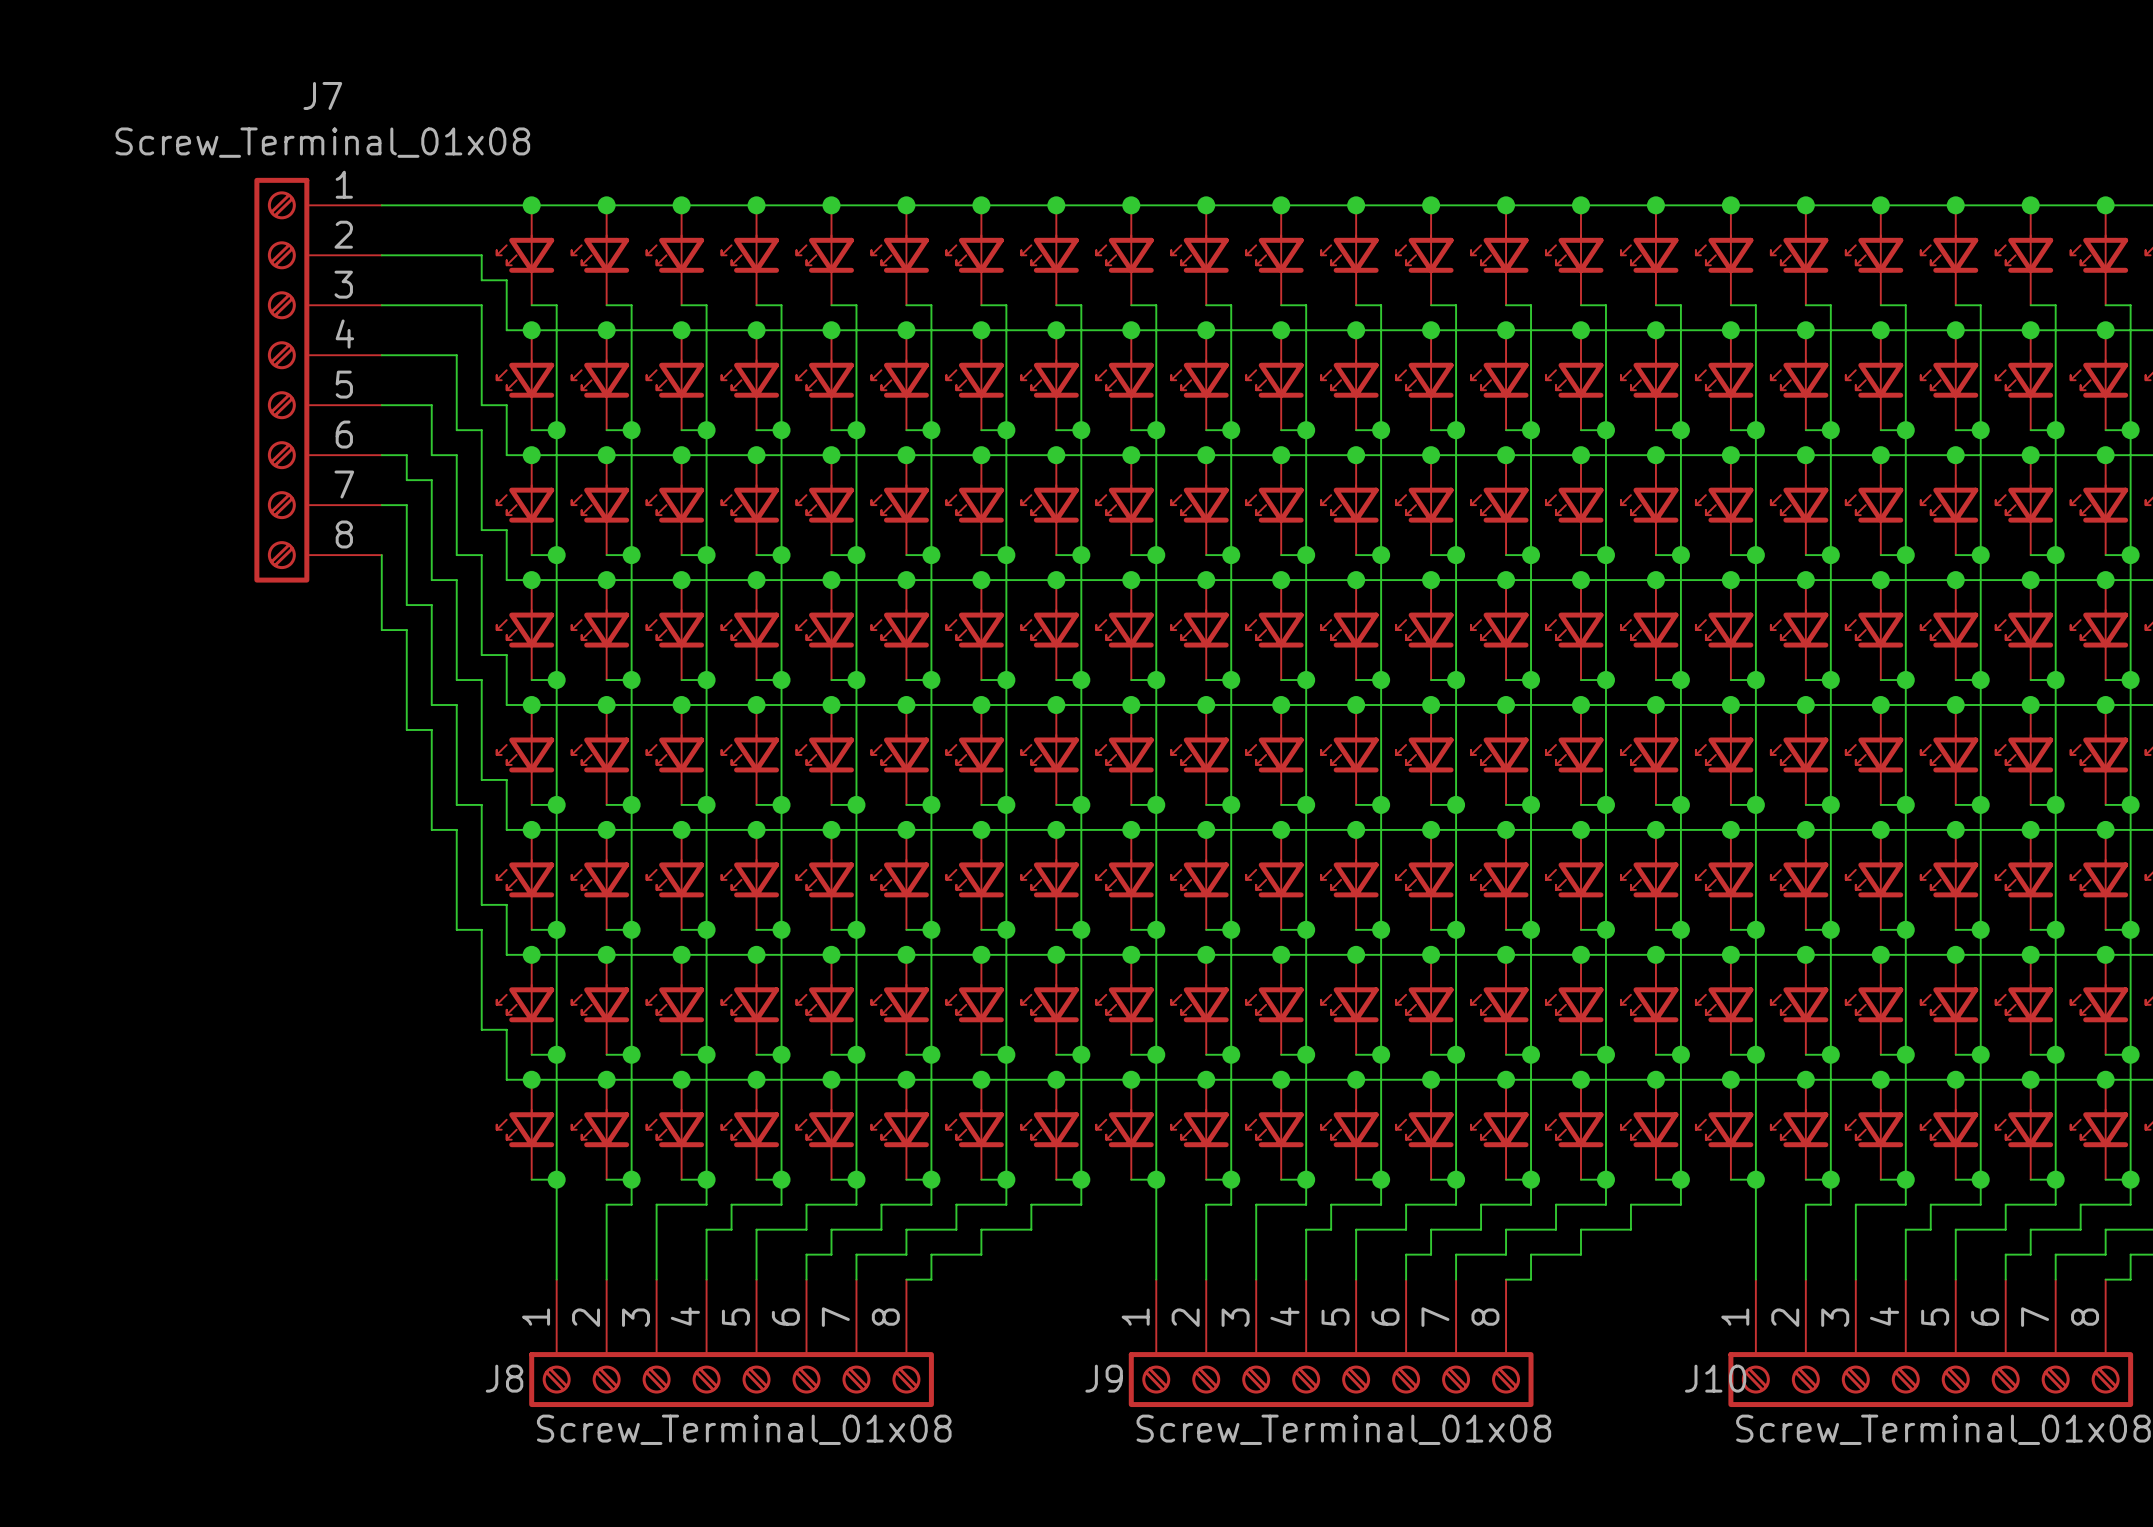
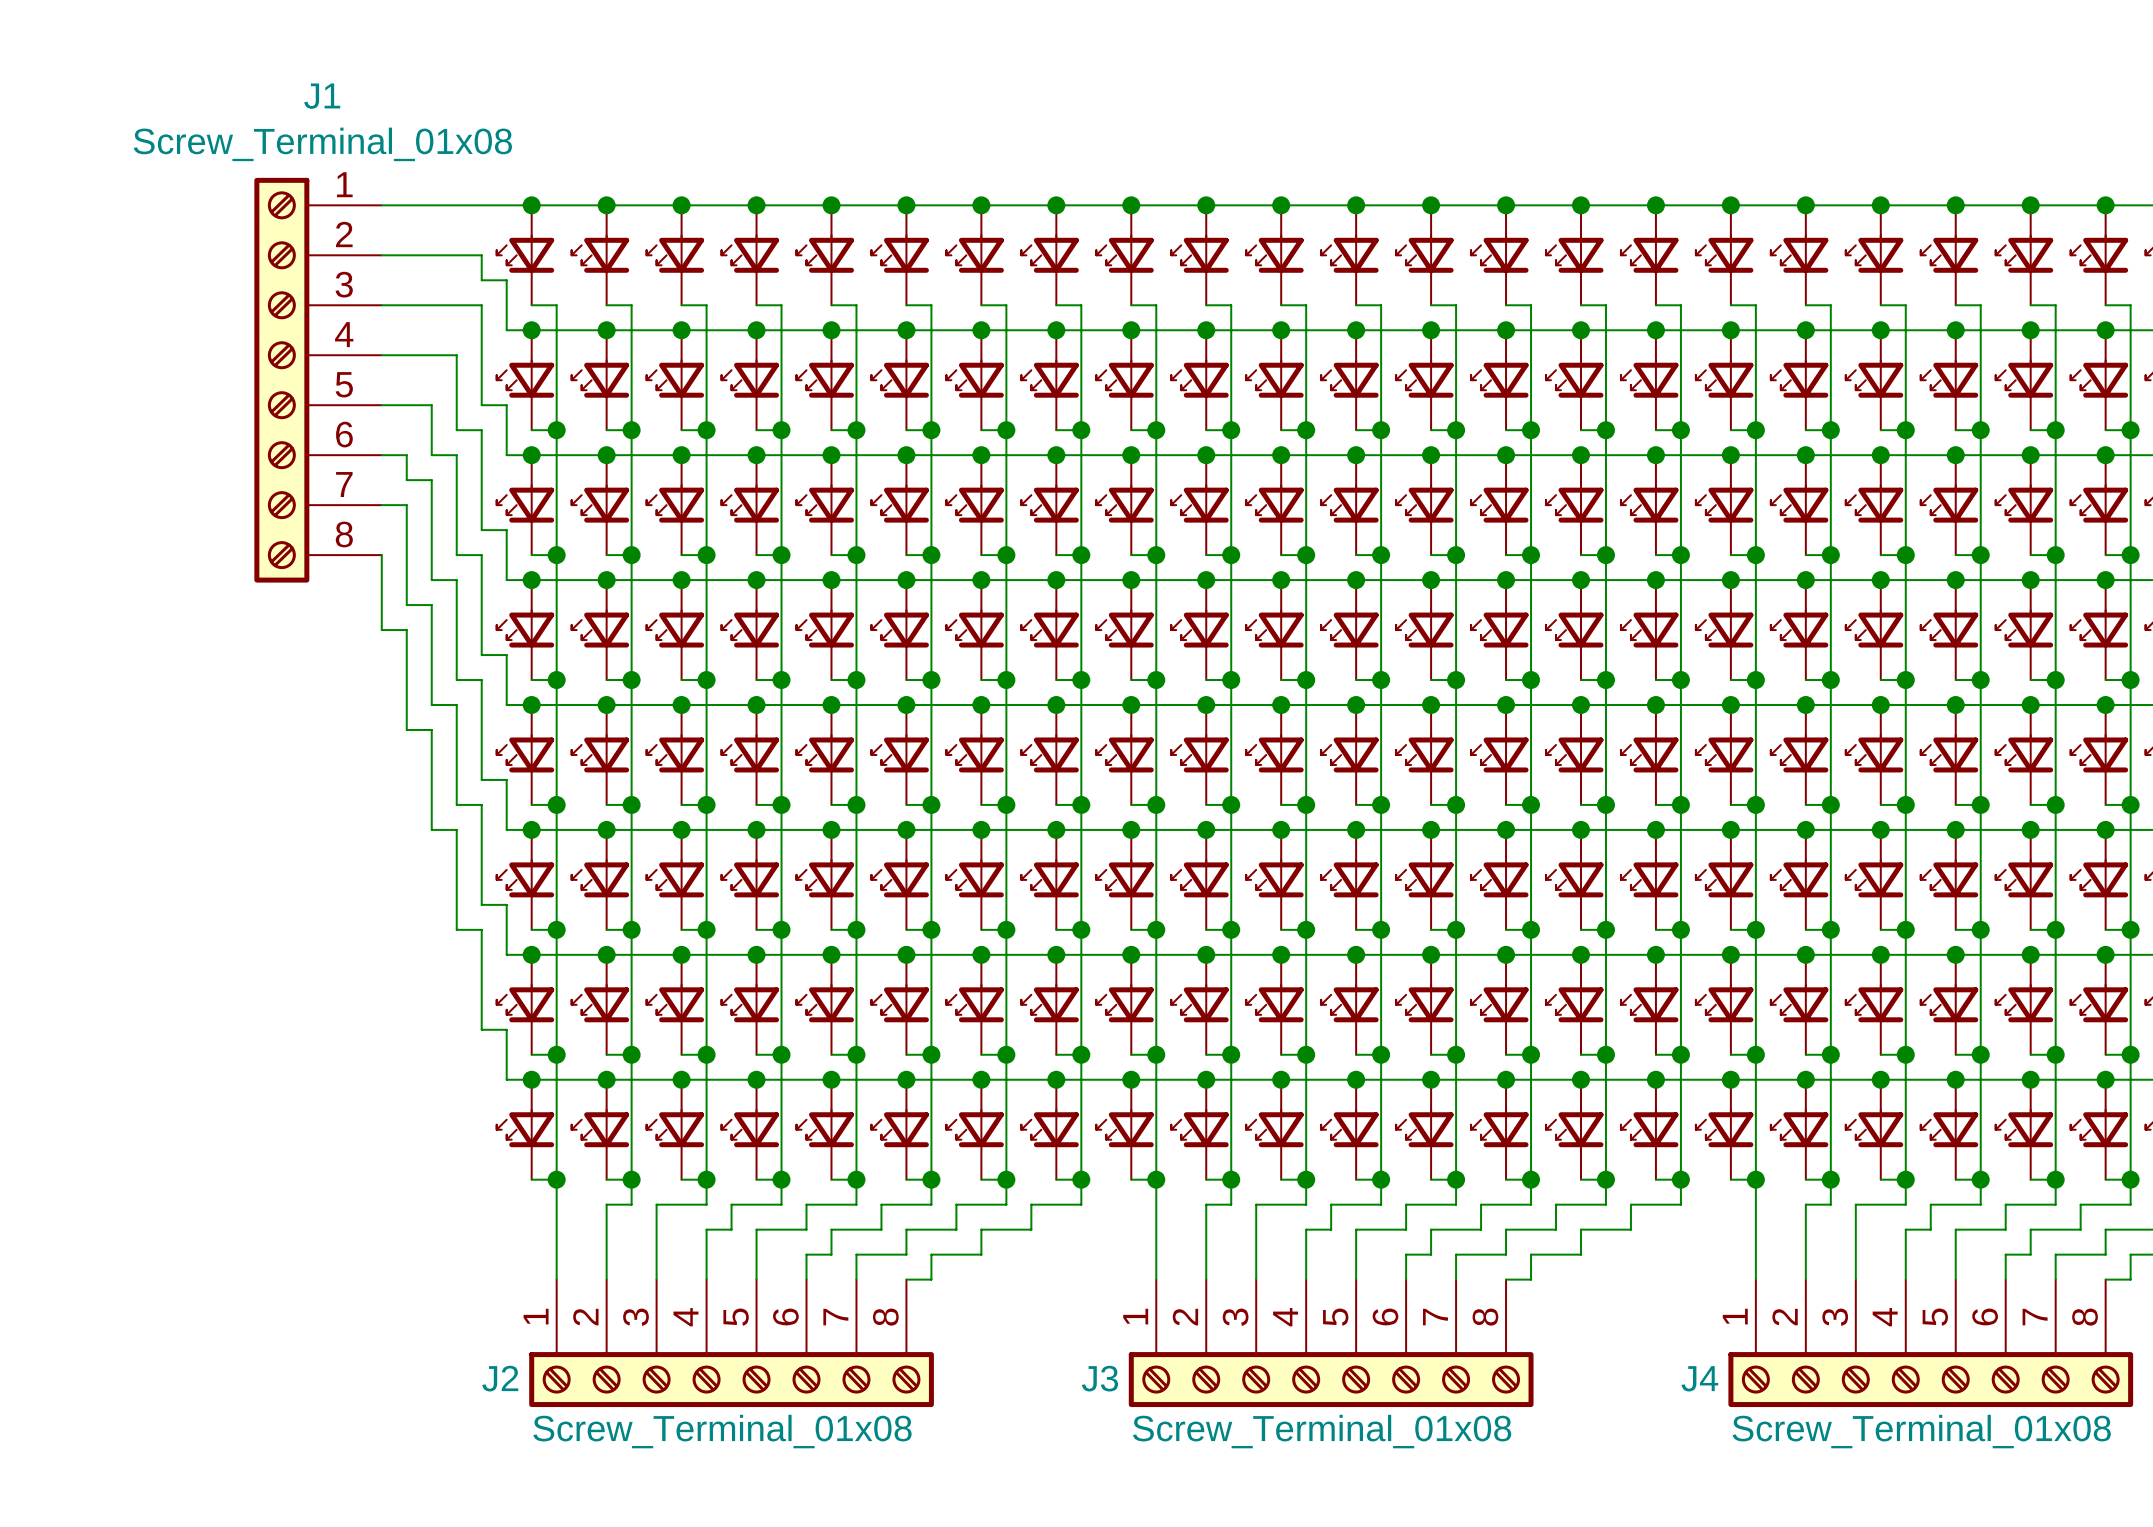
J7 name: J7 (322, 95) -> J1 (322, 96)
J8 name: J8 (504, 1378) -> J2 (500, 1378)
J9 name: J9 (1104, 1378) -> J3 (1099, 1378)
J10 name: J10 (1715, 1378) -> J4 (1699, 1378)

